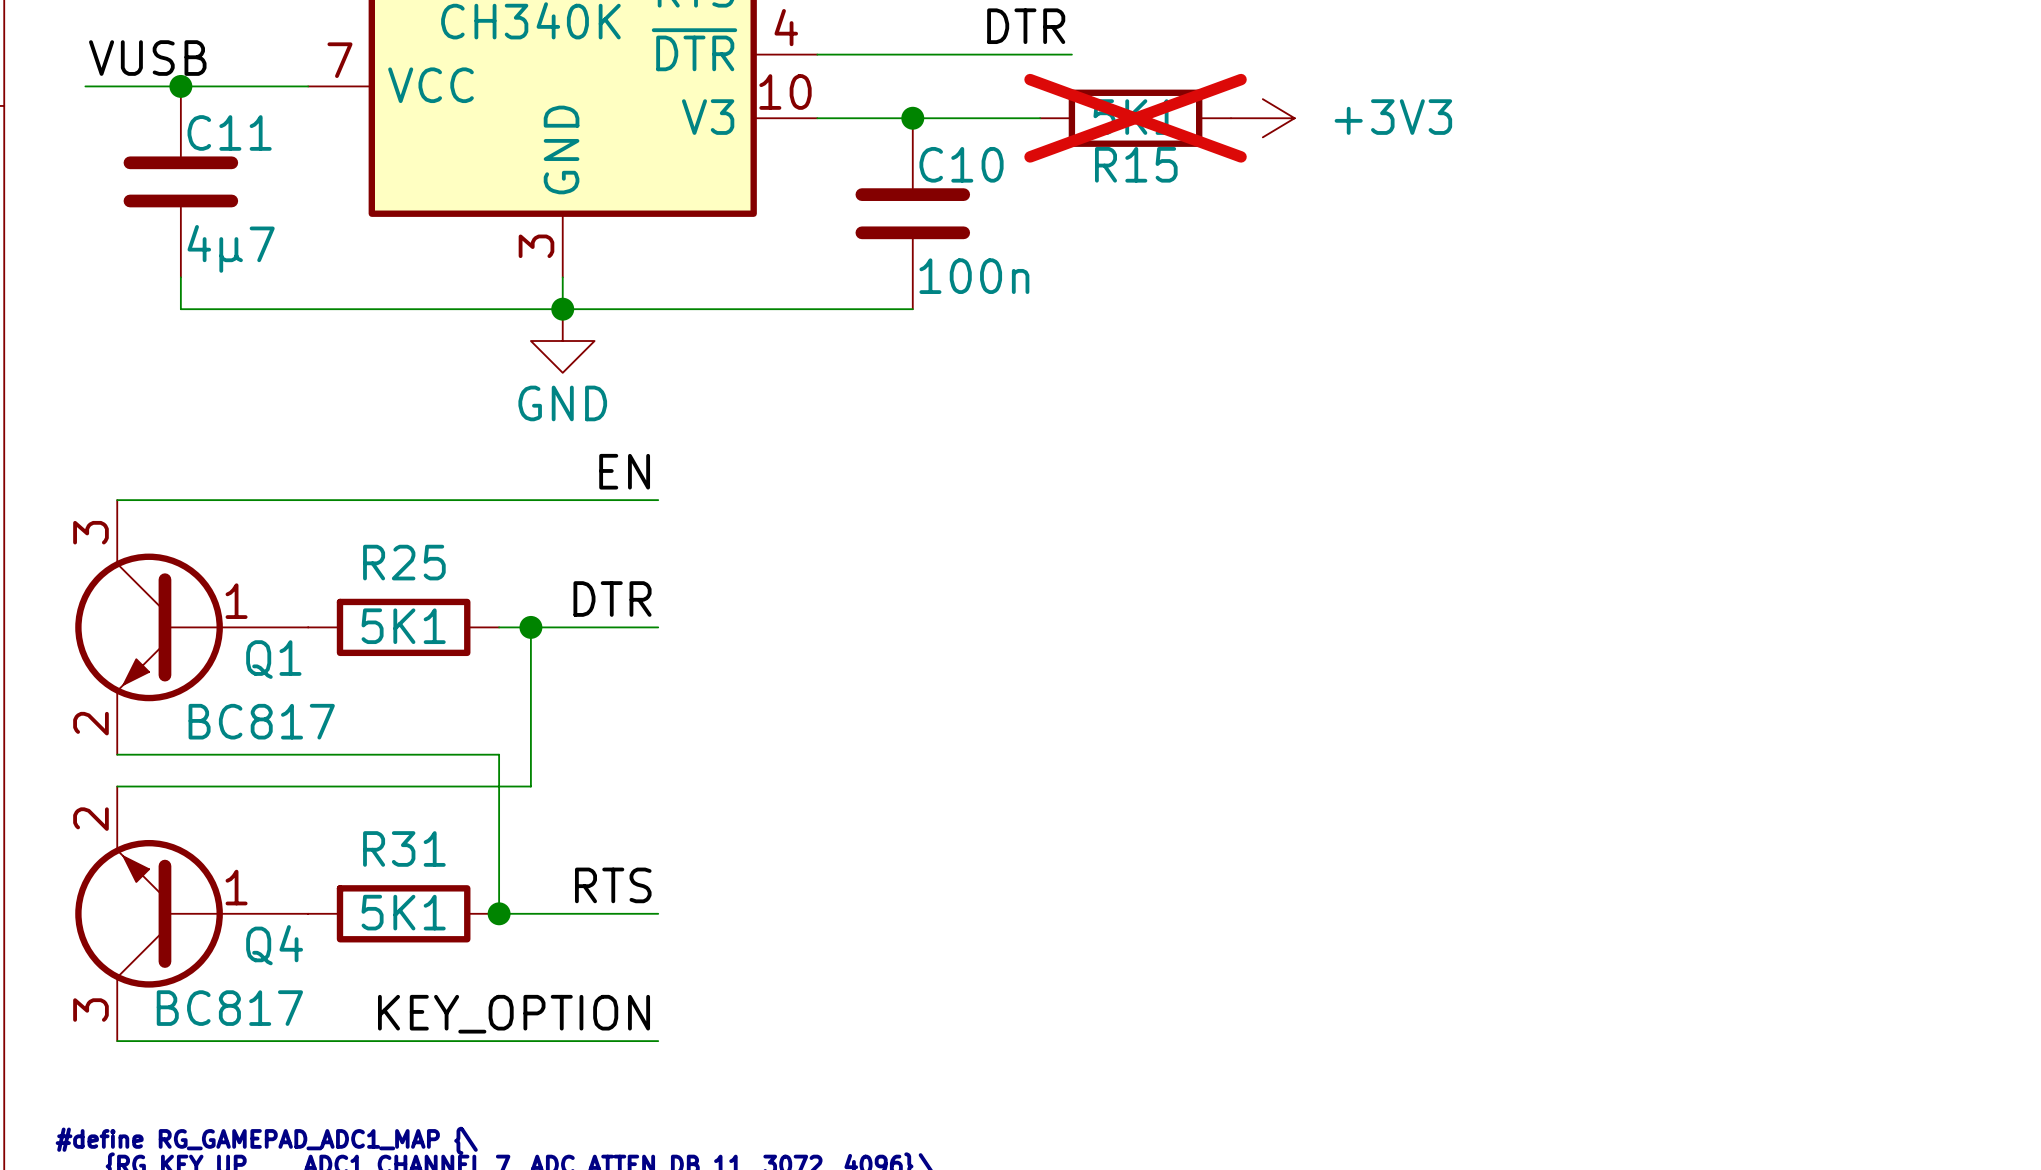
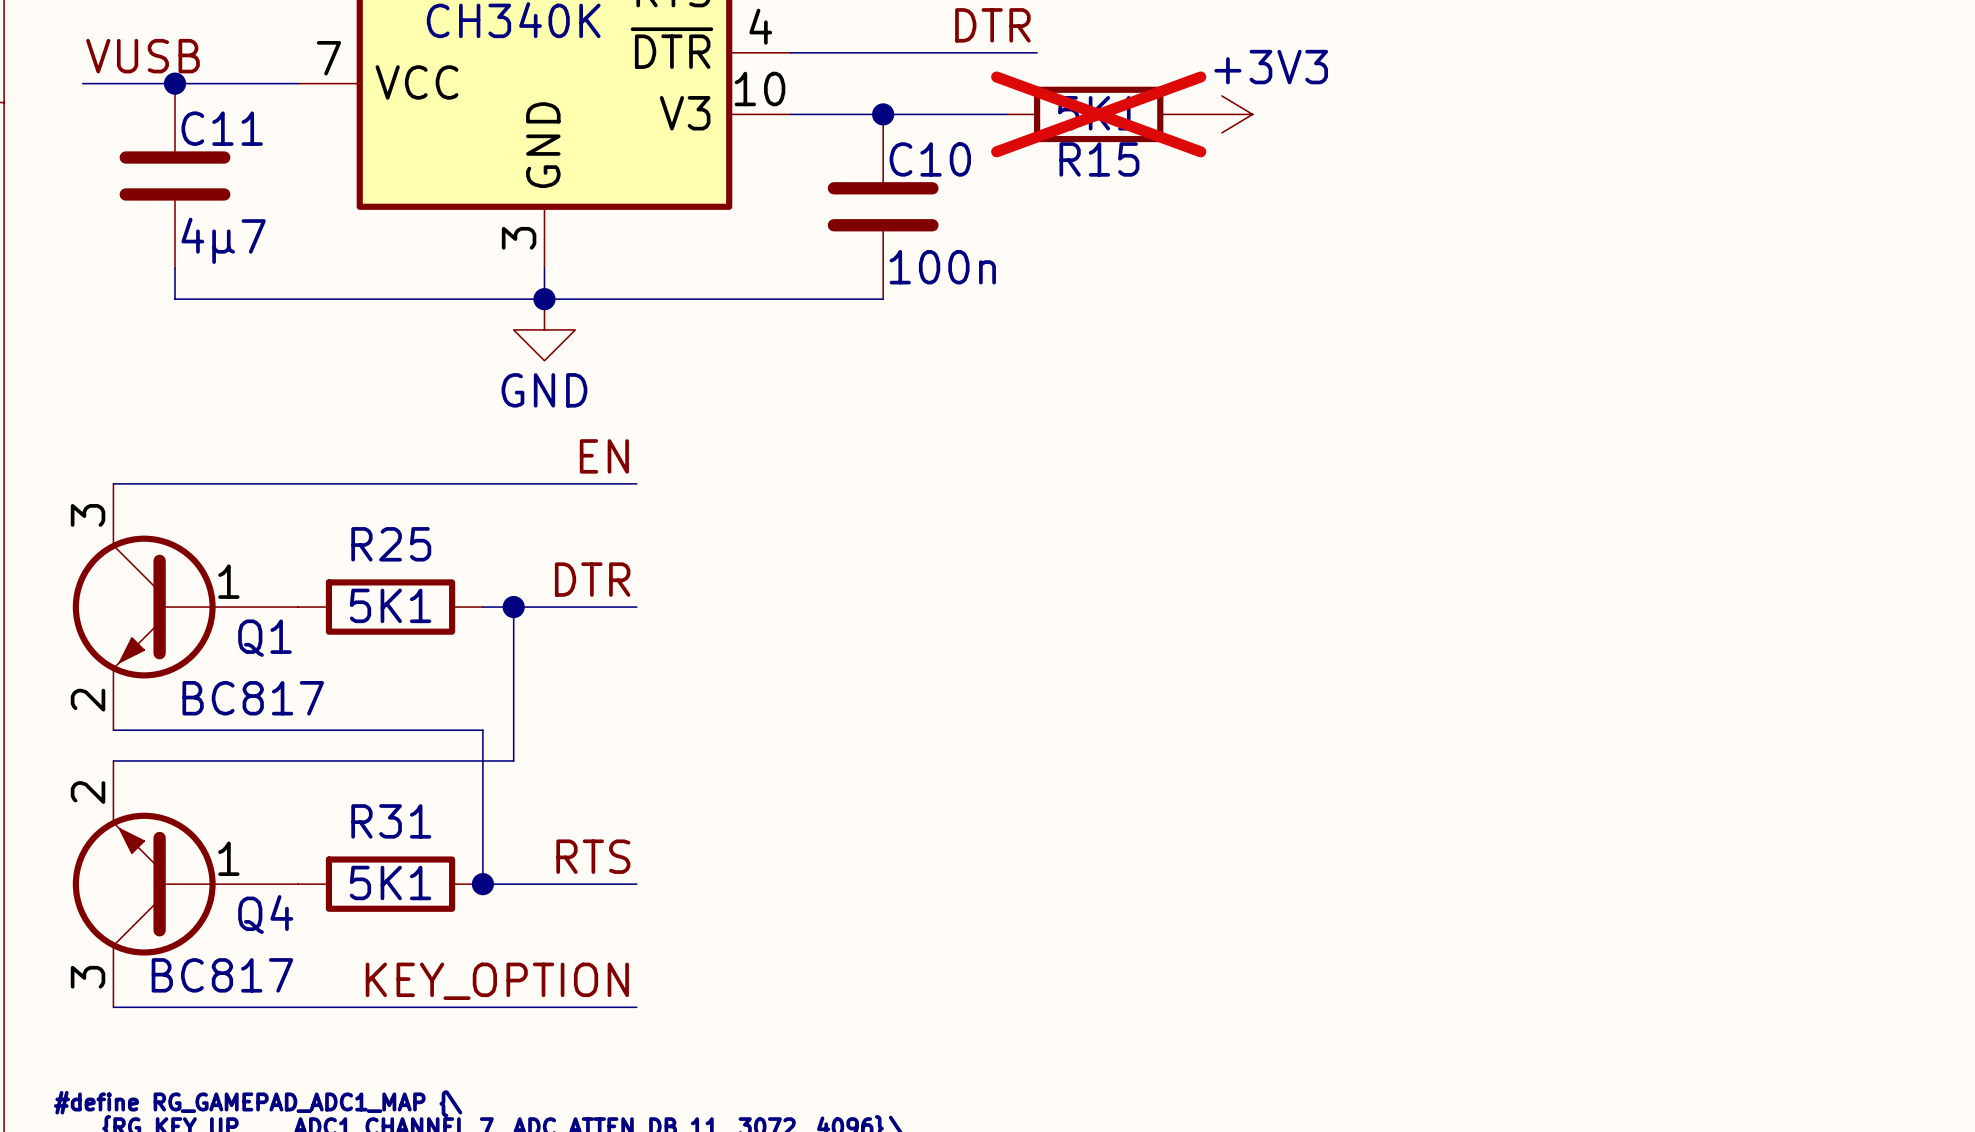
power symbol text position: +3V3 (1393, 117) -> +3V3 (1271, 67)

